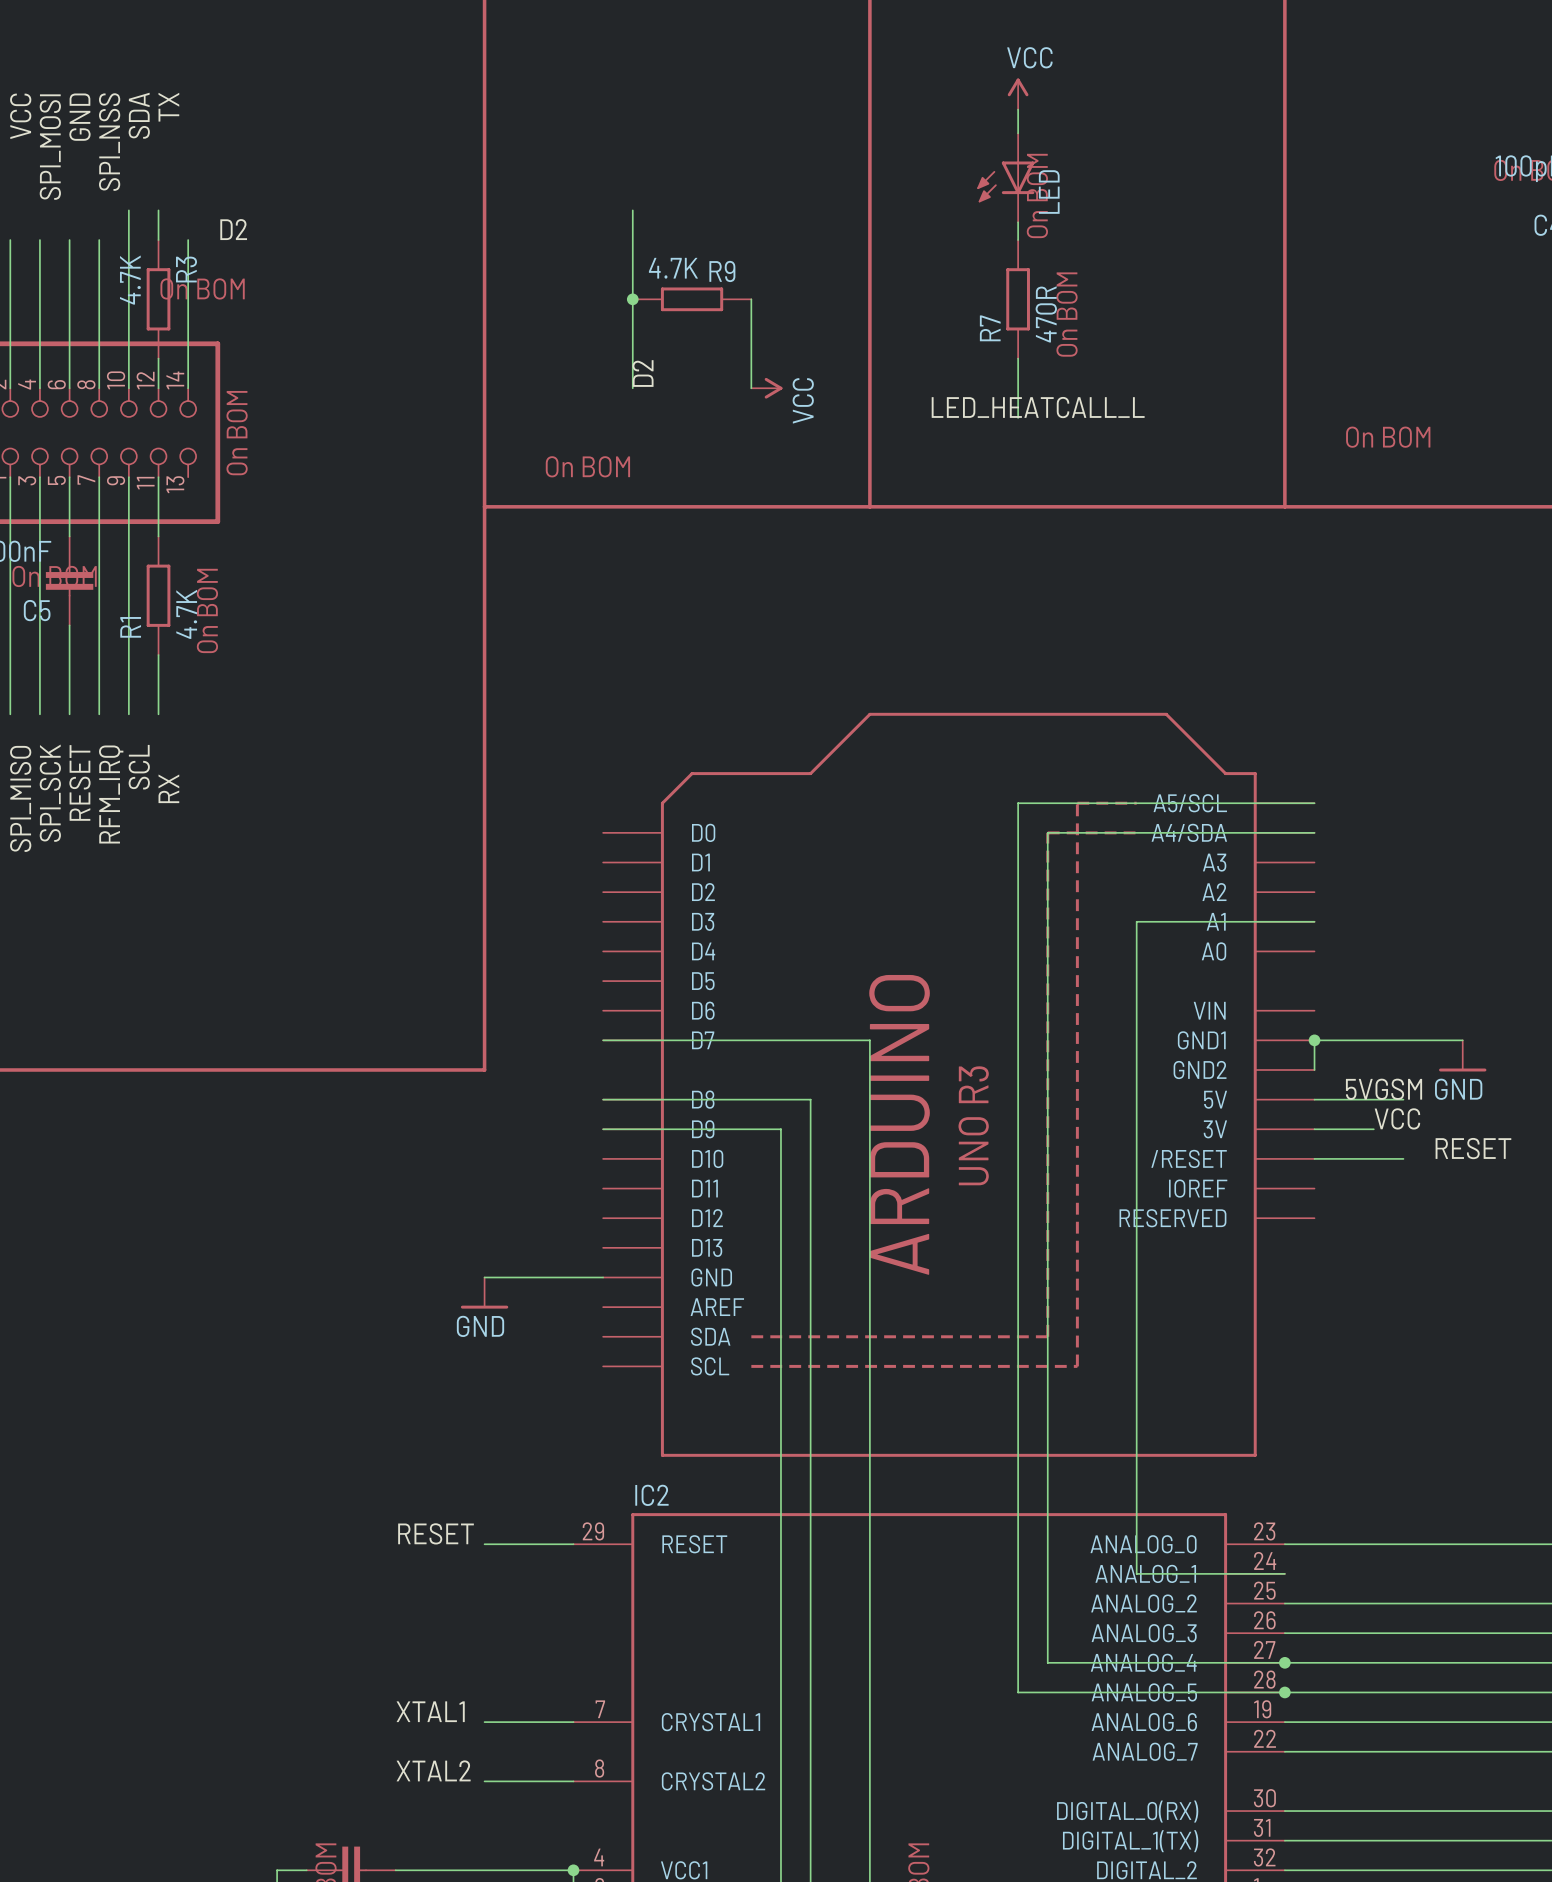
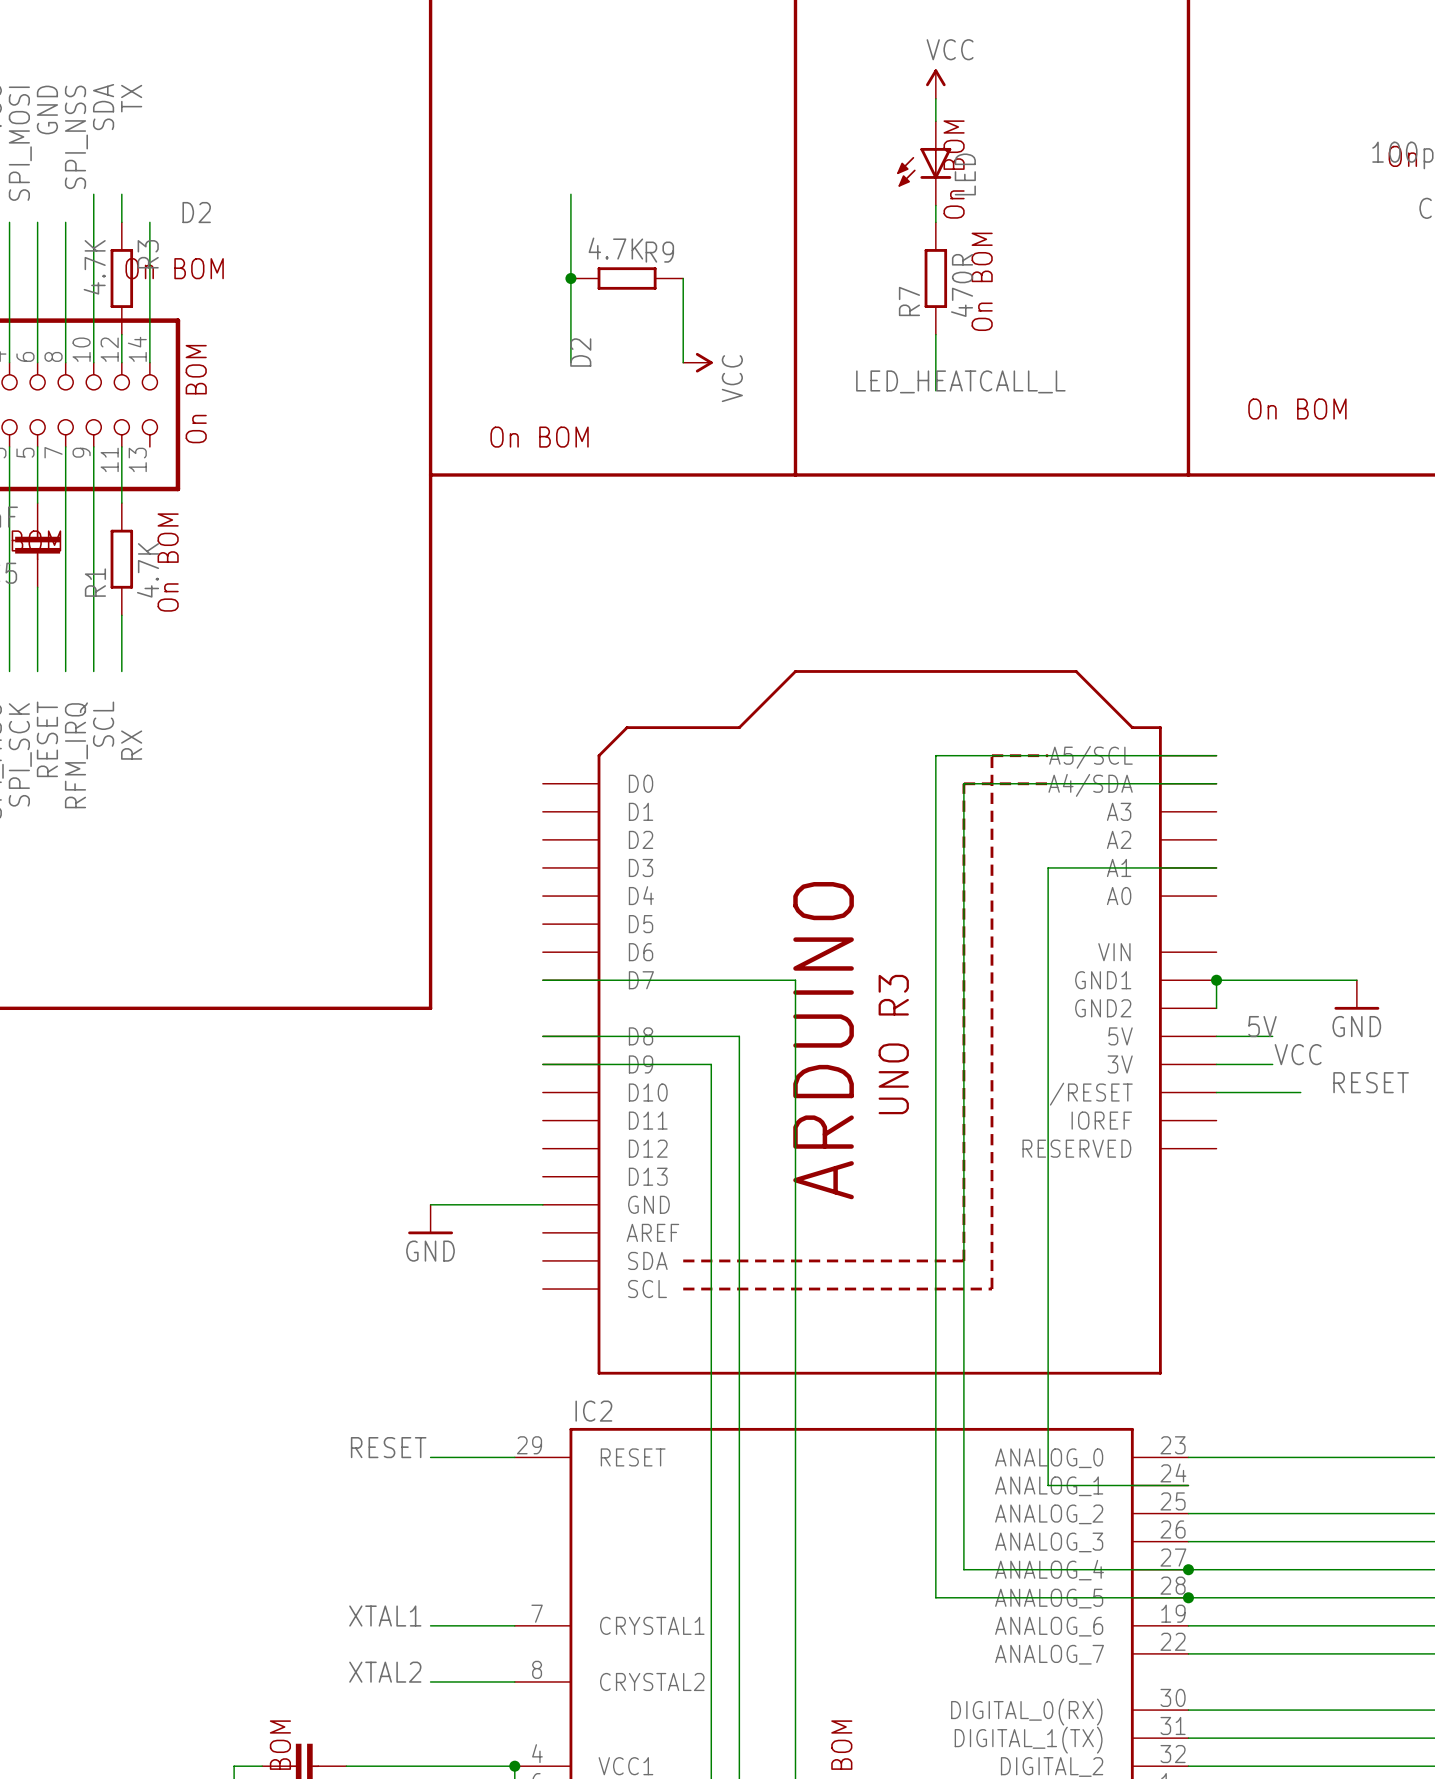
label: 5VGSM (1384, 1089) -> 5V (1262, 1026)
wire: (1373, 1099) (1403, 1099) -> none

